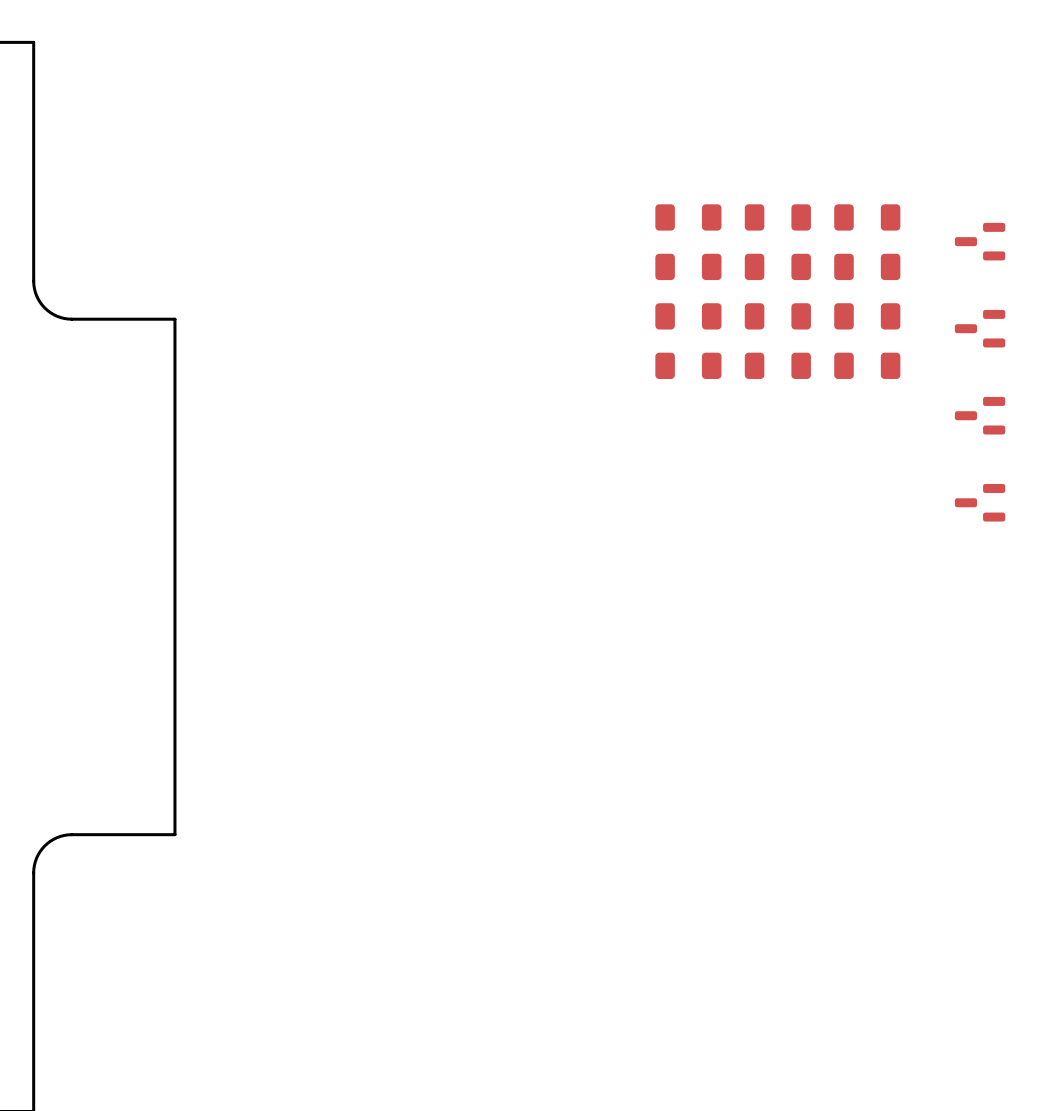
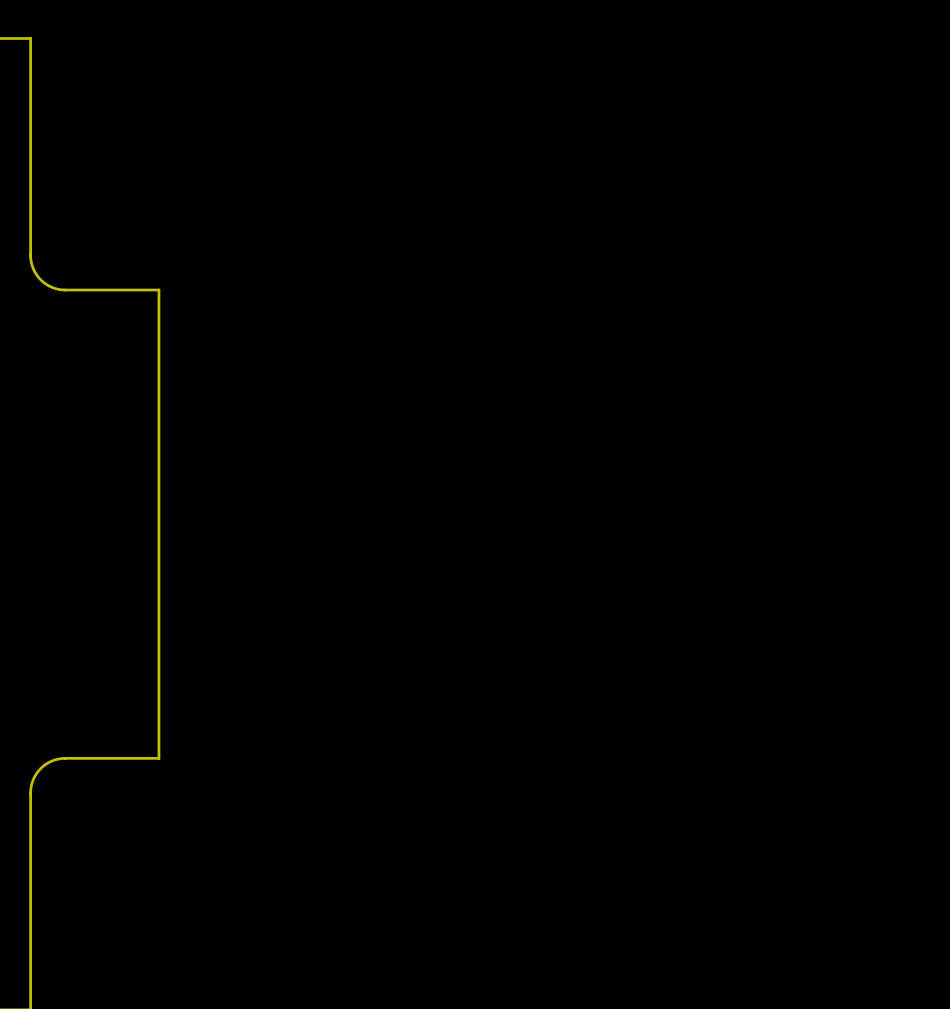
part: (688, 217) -> none
part: (777, 217) -> none
part: (867, 217) -> none
part: (980, 241) -> none
part: (688, 266) -> none
part: (777, 266) -> none
part: (867, 266) -> none
part: (688, 316) -> none
part: (777, 316) -> none
part: (867, 316) -> none
part: (980, 328) -> none
part: (688, 365) -> none
part: (777, 365) -> none
part: (867, 365) -> none
part: (980, 415) -> none
part: (980, 502) -> none

